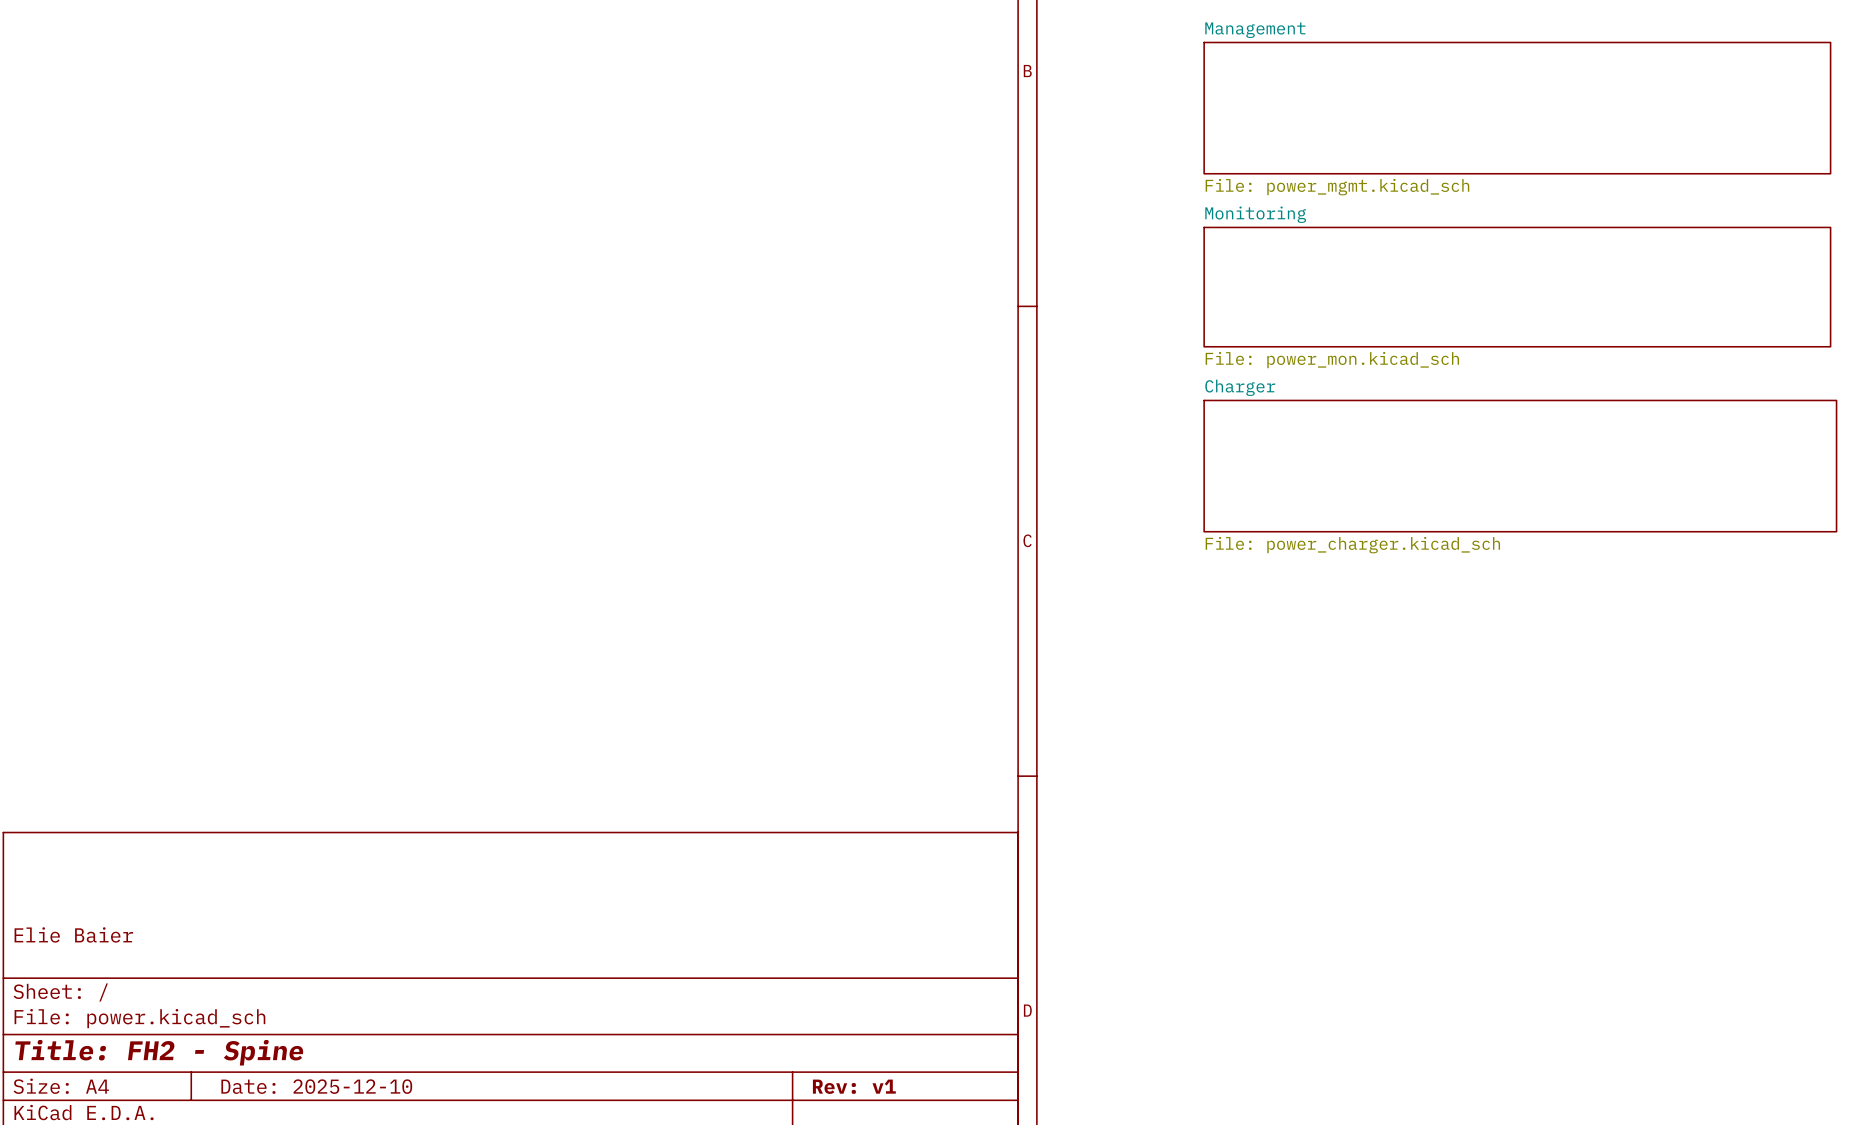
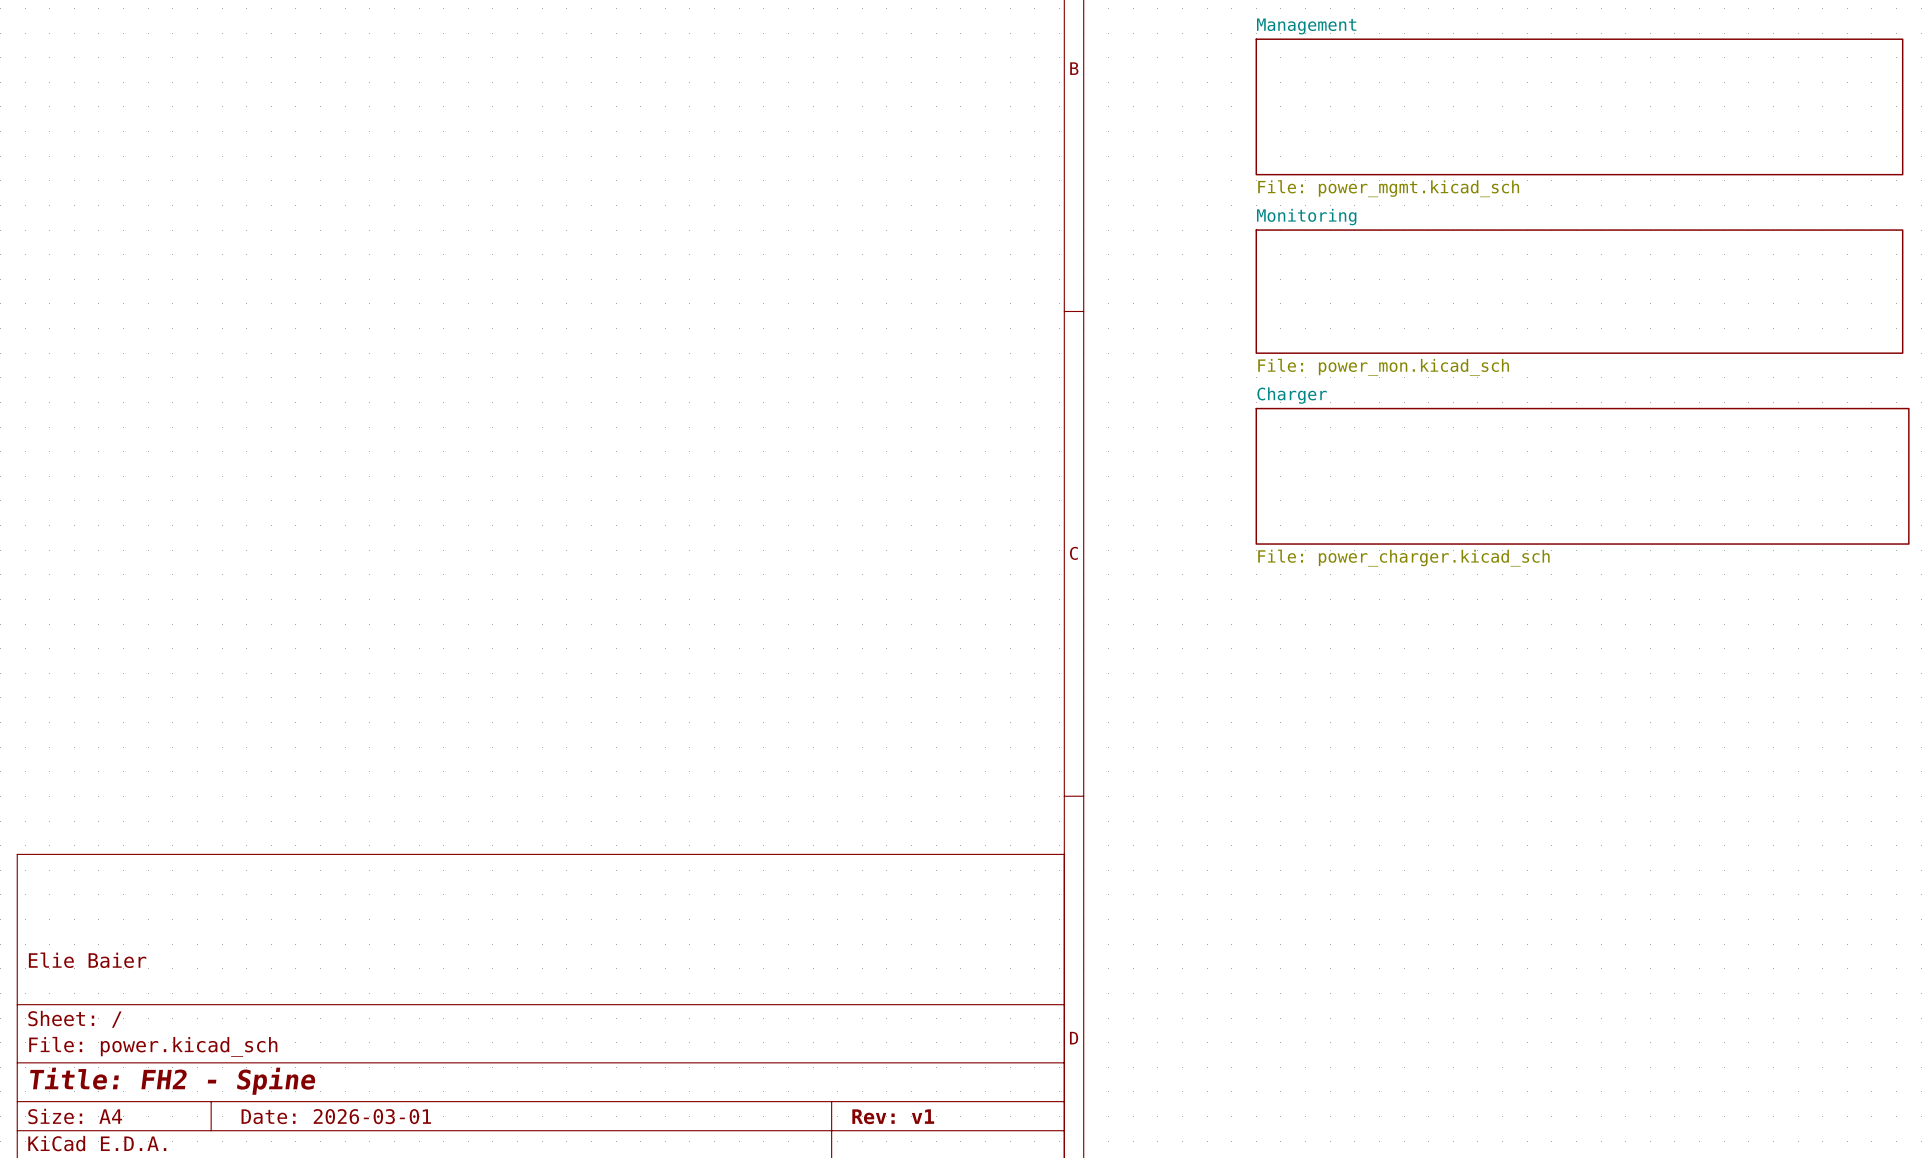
title block: Date: 2025-12-10 (316, 1086) -> Date: 2026-03-01 (336, 1116)

